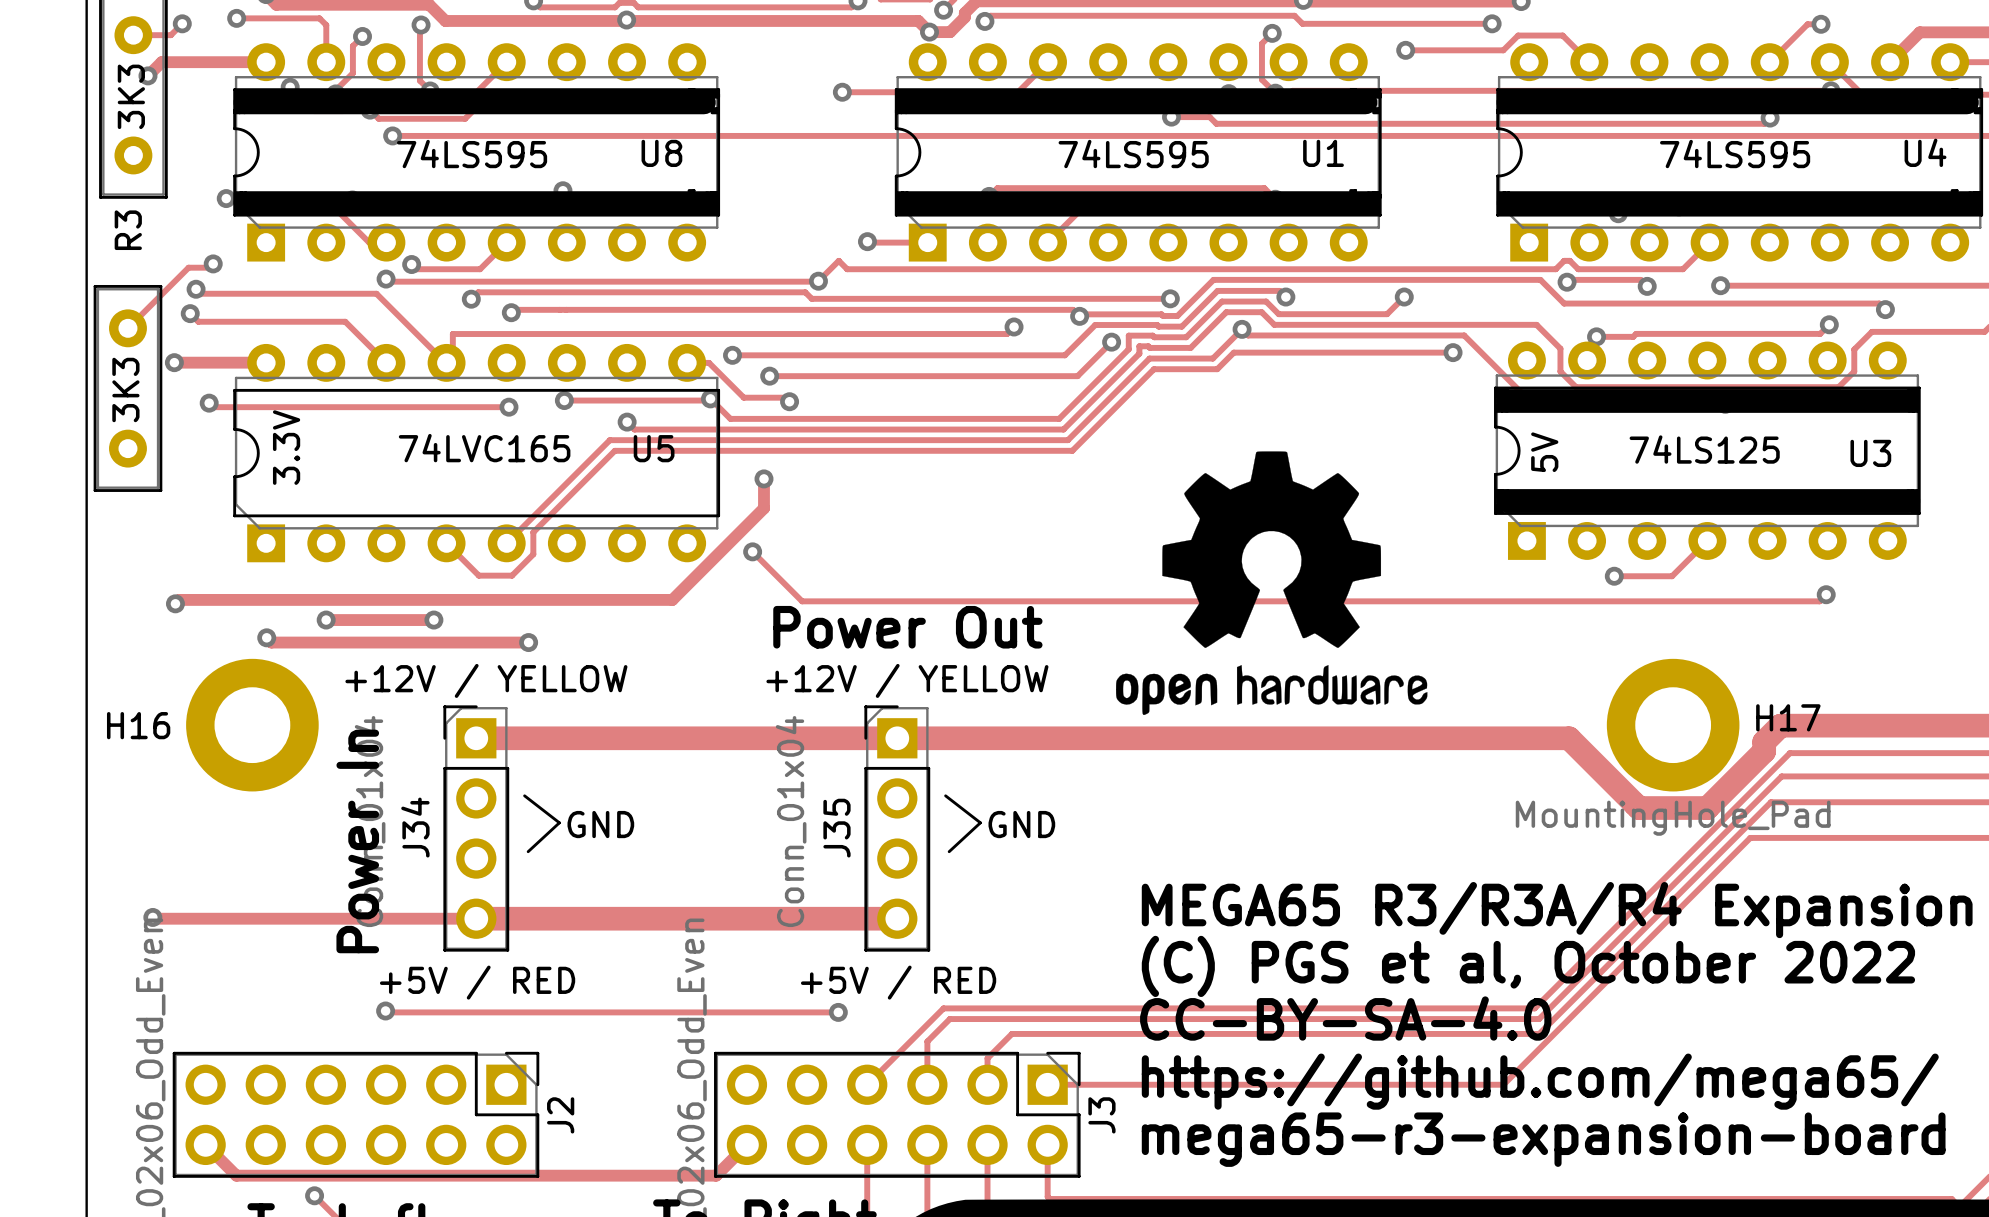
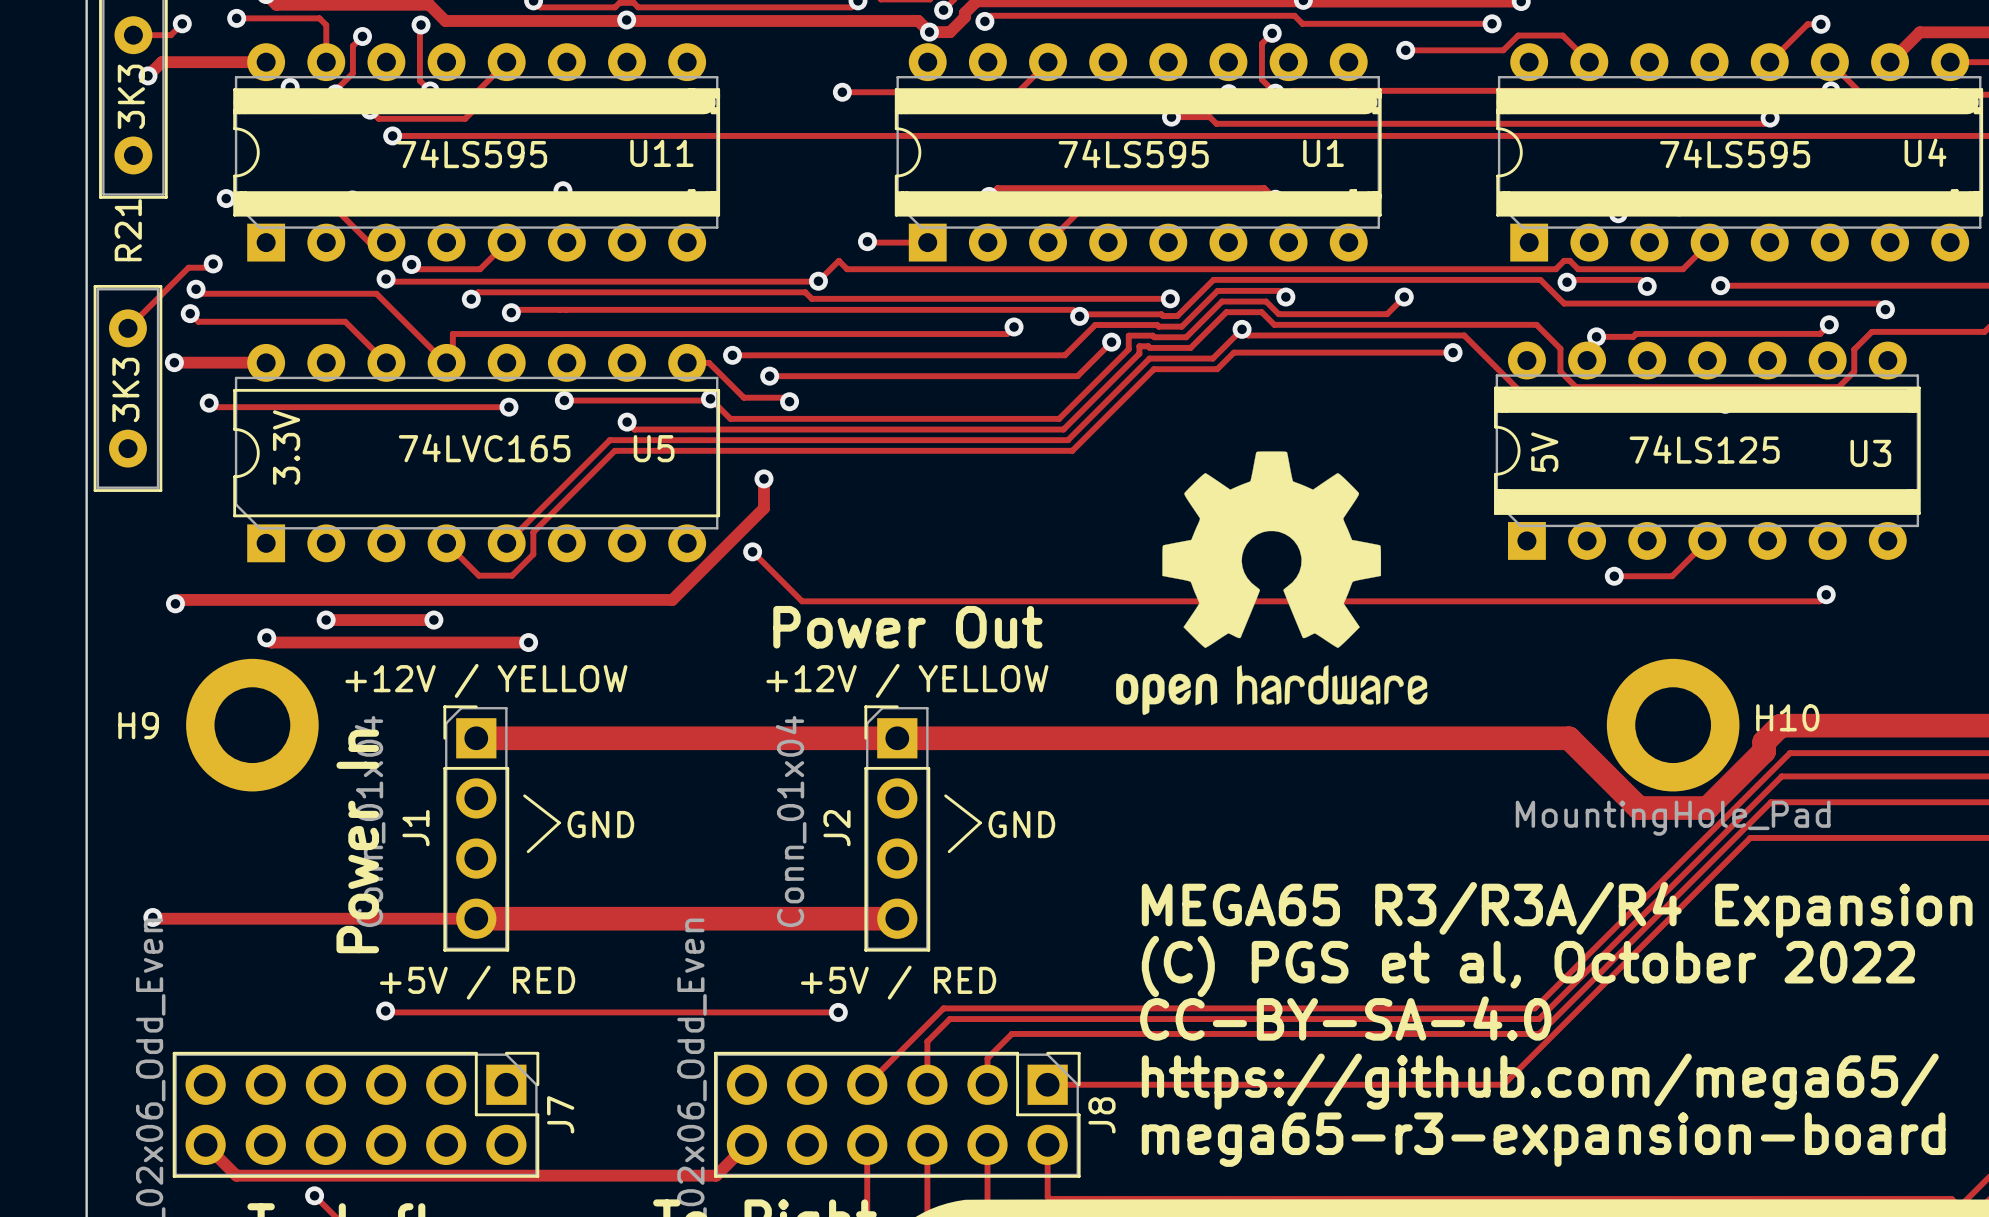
U8 name: U8 (661, 153) -> U11 (661, 153)
R3 name: R3 (128, 230) -> R21 (128, 230)
H17 name: H17 (1788, 717) -> H10 (1787, 717)
H16 name: H16 (138, 725) -> H9 (138, 725)
J34 name: J34 (415, 827) -> J1 (415, 828)
J35 name: J35 (836, 828) -> J2 (836, 828)
J2 name: J2 (560, 1115) -> J7 (560, 1114)
J3 name: J3 (1101, 1115) -> J8 (1101, 1115)

